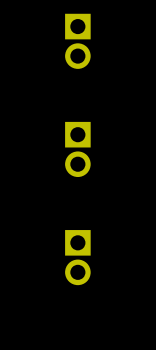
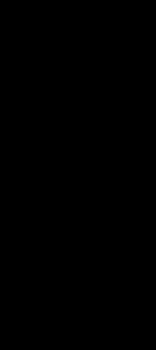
part: (77, 41) -> none
part: (77, 149) -> none
part: (77, 257) -> none

